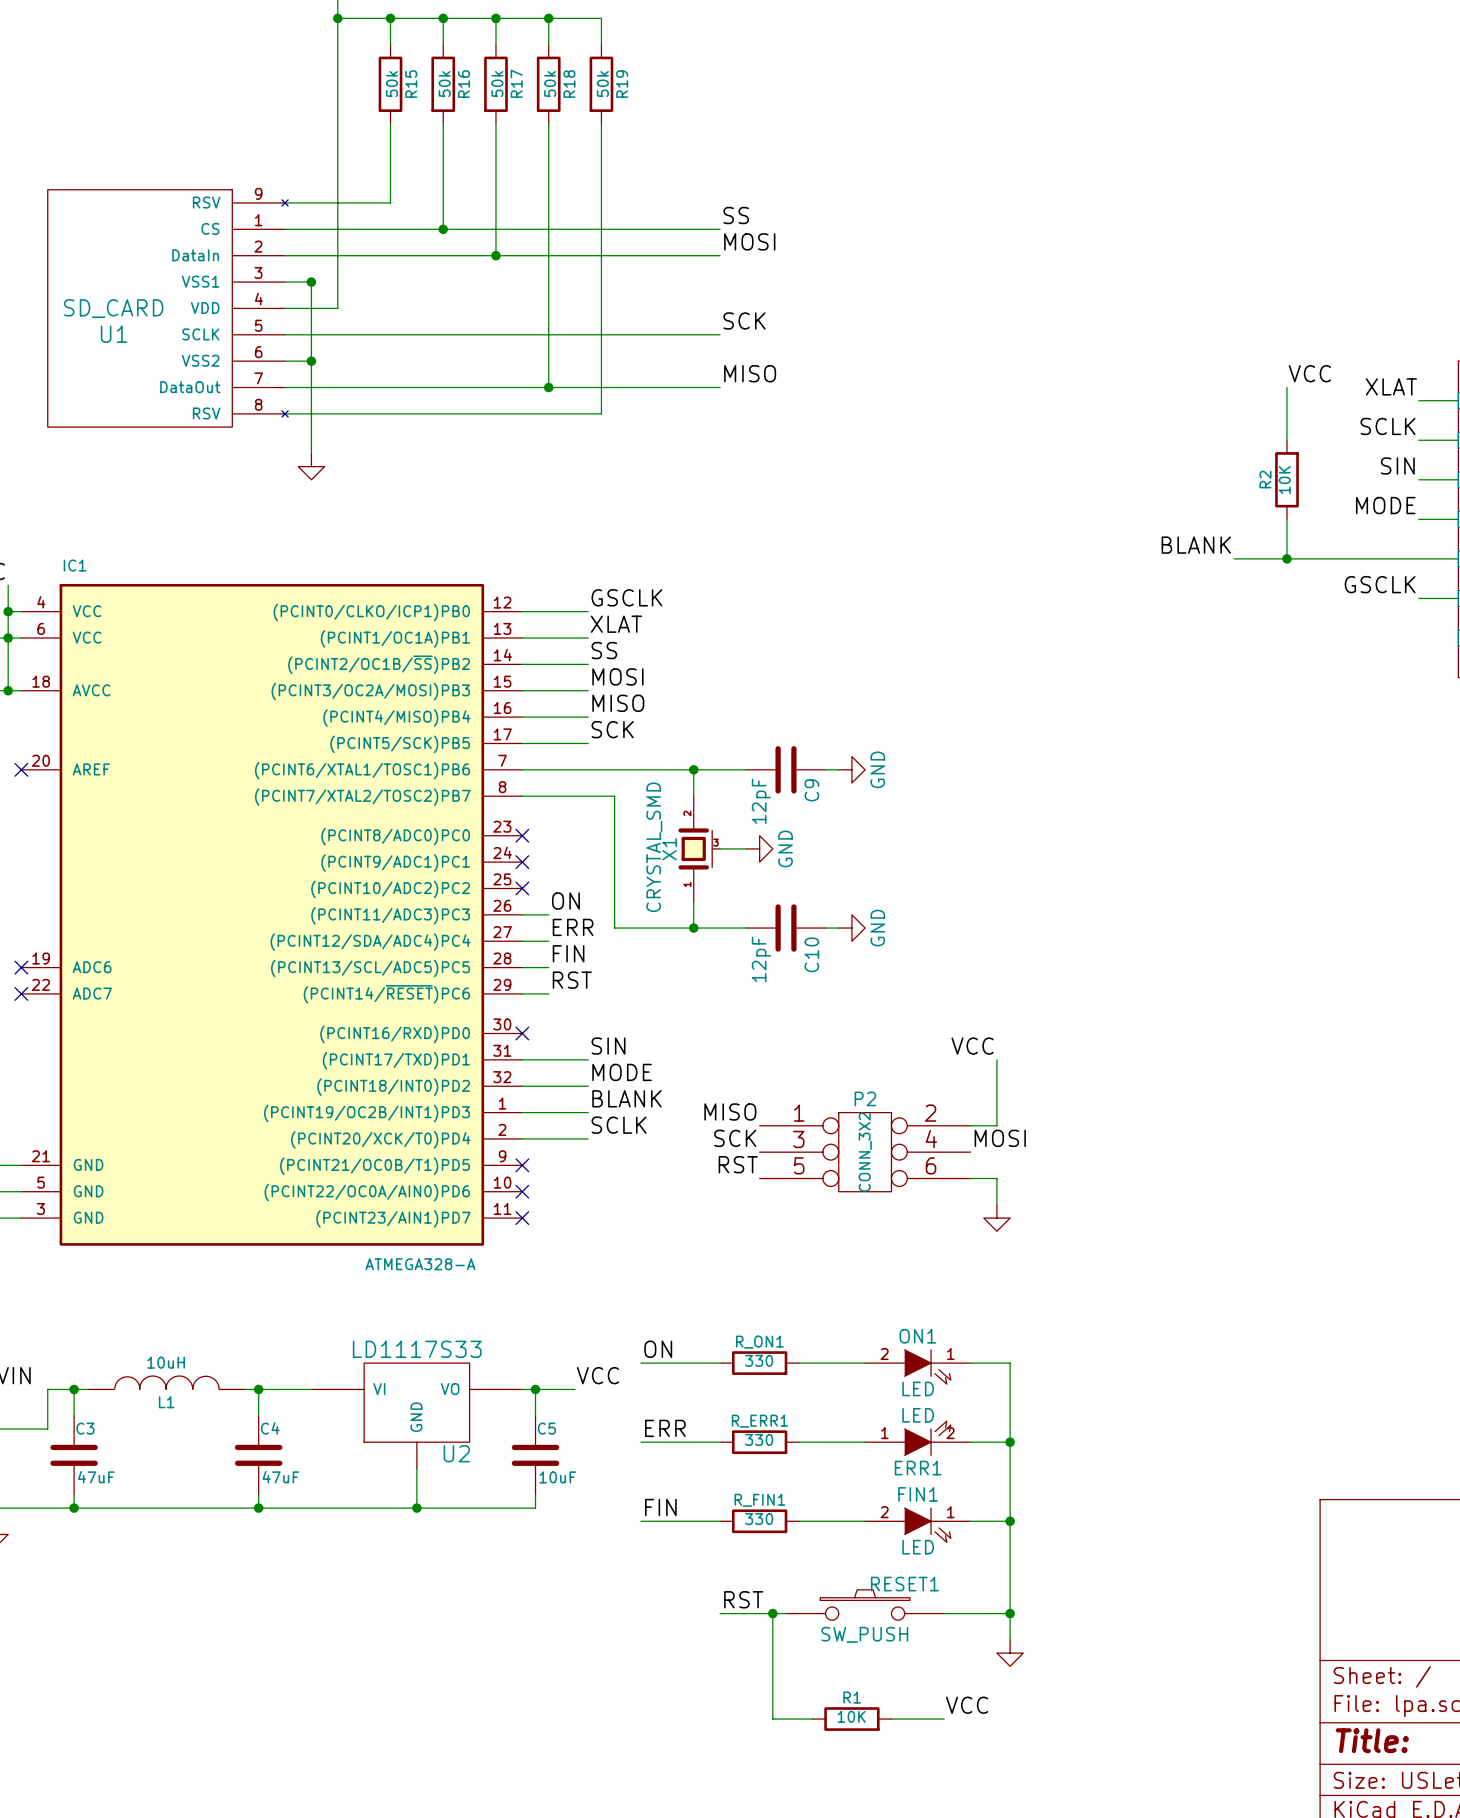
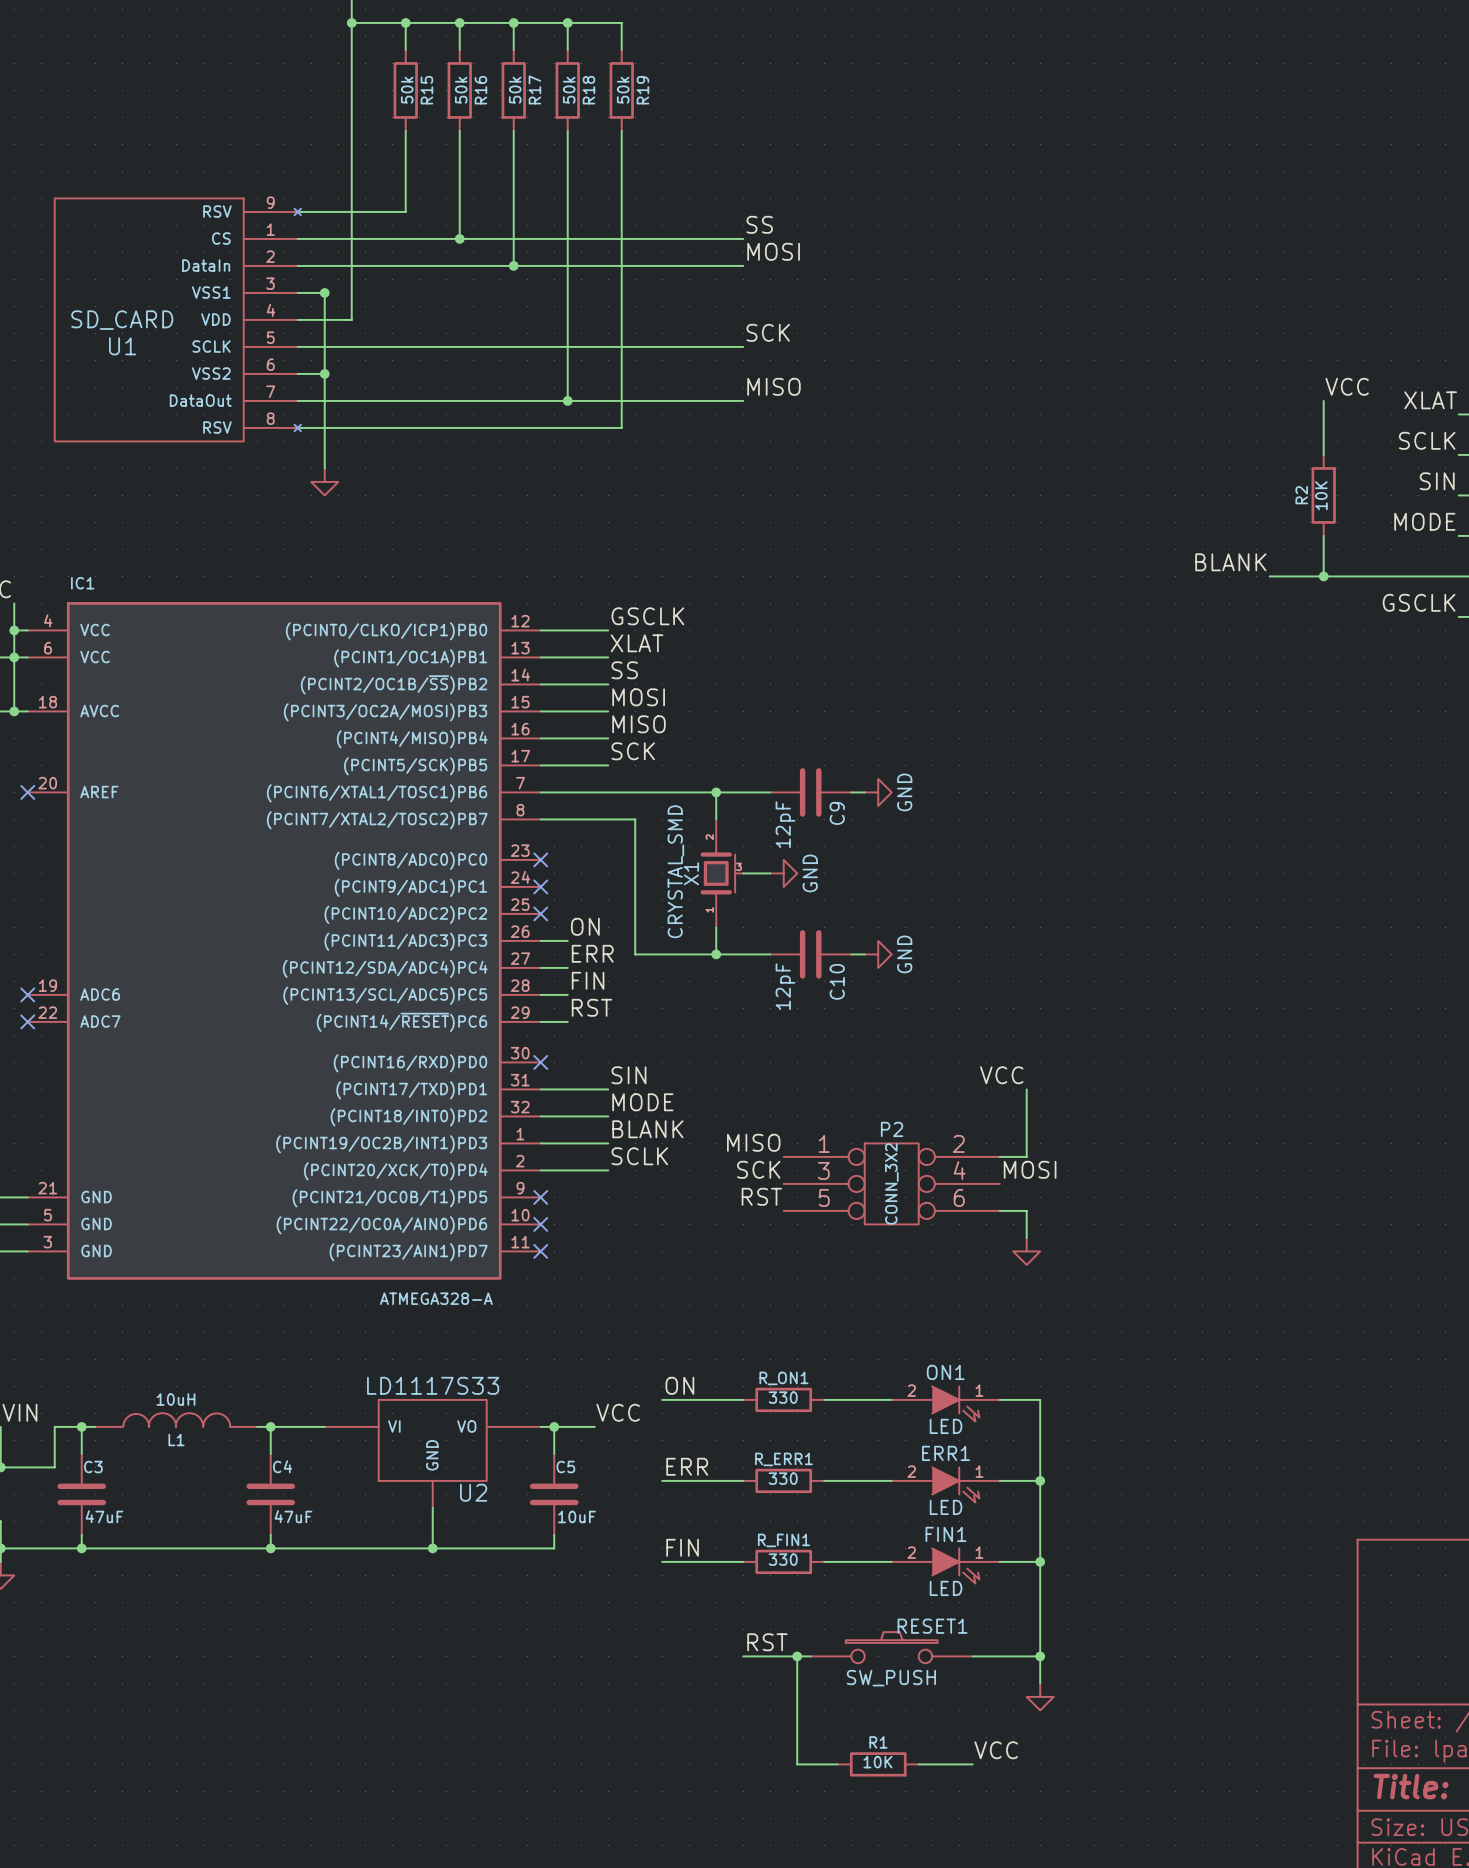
ERR1 value position: LED (918, 1415) -> LED (946, 1507)
ERR1 symbol: [865, 1421, 971, 1456] -> [891, 1467, 1000, 1503]
ERR1 name position: ERR1 (918, 1468) -> ERR1 (946, 1453)

